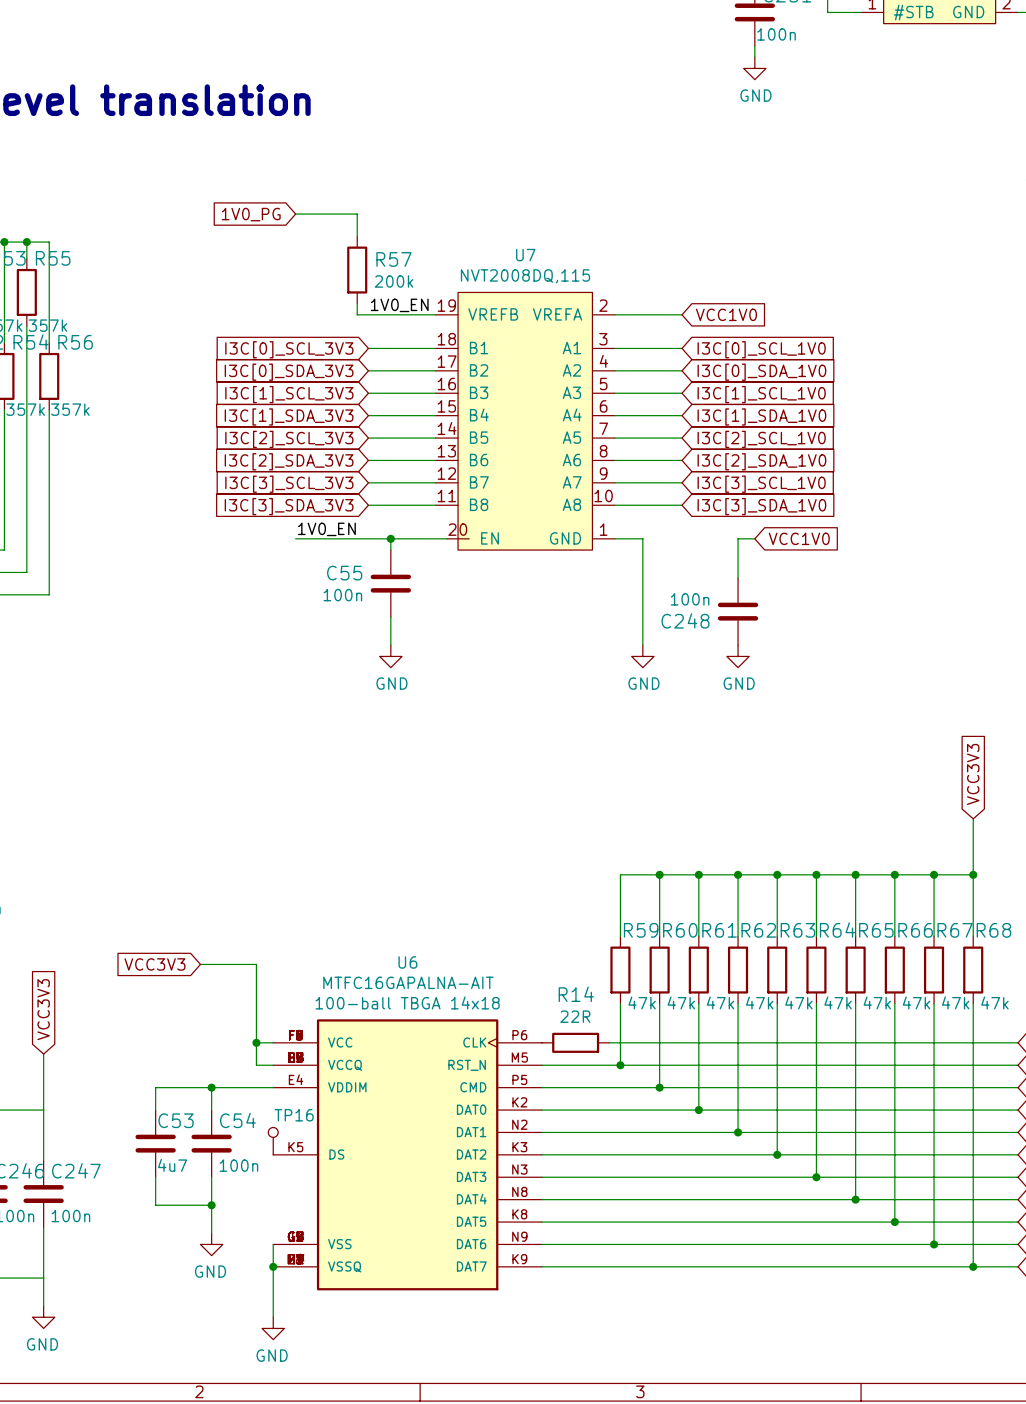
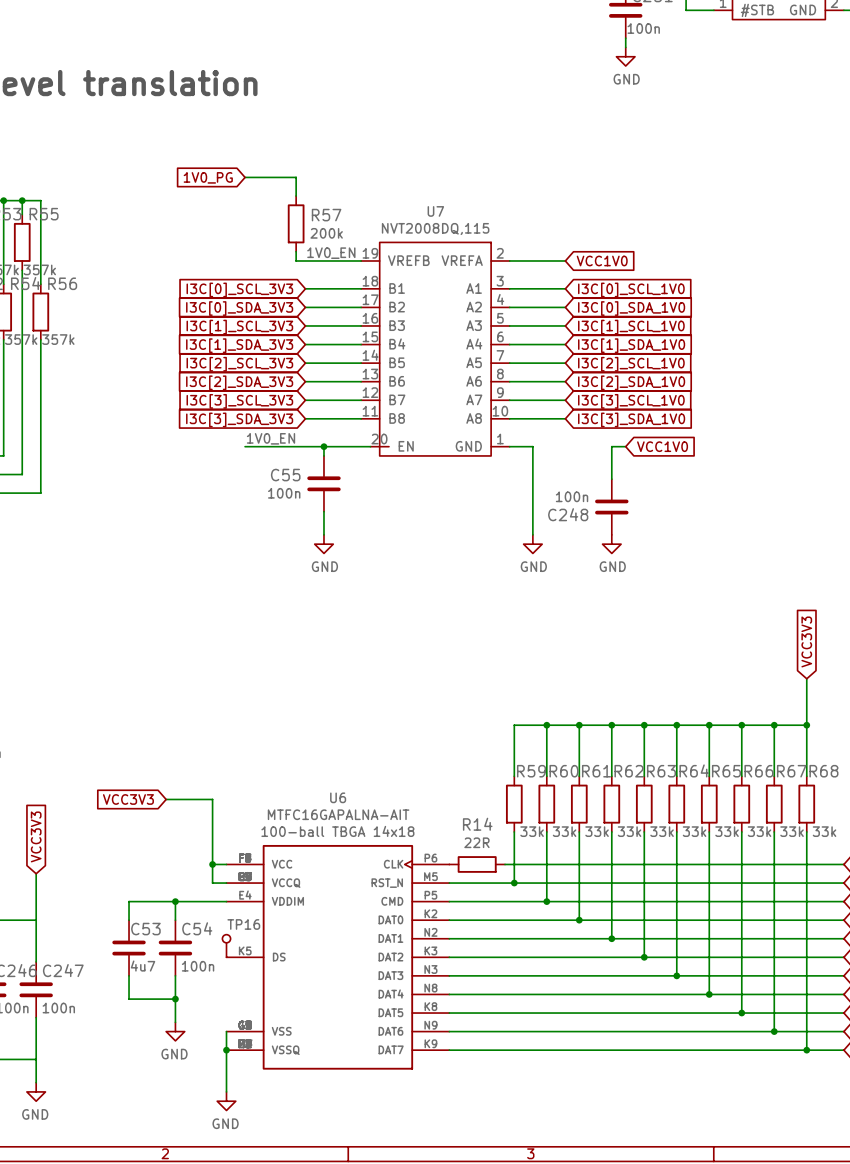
R59 text: 47k (642, 1002) -> 33k (532, 831)
R60 text: 47k (681, 1002) -> 33k (564, 831)
R61 text: 47k (720, 1002) -> 33k (597, 831)
R62 text: 47k (759, 1002) -> 33k (629, 831)
R63 text: 47k (798, 1002) -> 33k (662, 831)
R64 text: 47k (838, 1002) -> 33k (694, 831)
R65 text: 47k (877, 1002) -> 33k (727, 831)
R66 text: 47k (916, 1002) -> 33k (759, 831)
R67 text: 47k (955, 1002) -> 33k (792, 831)
R68 text: 47k (994, 1002) -> 33k (824, 831)

